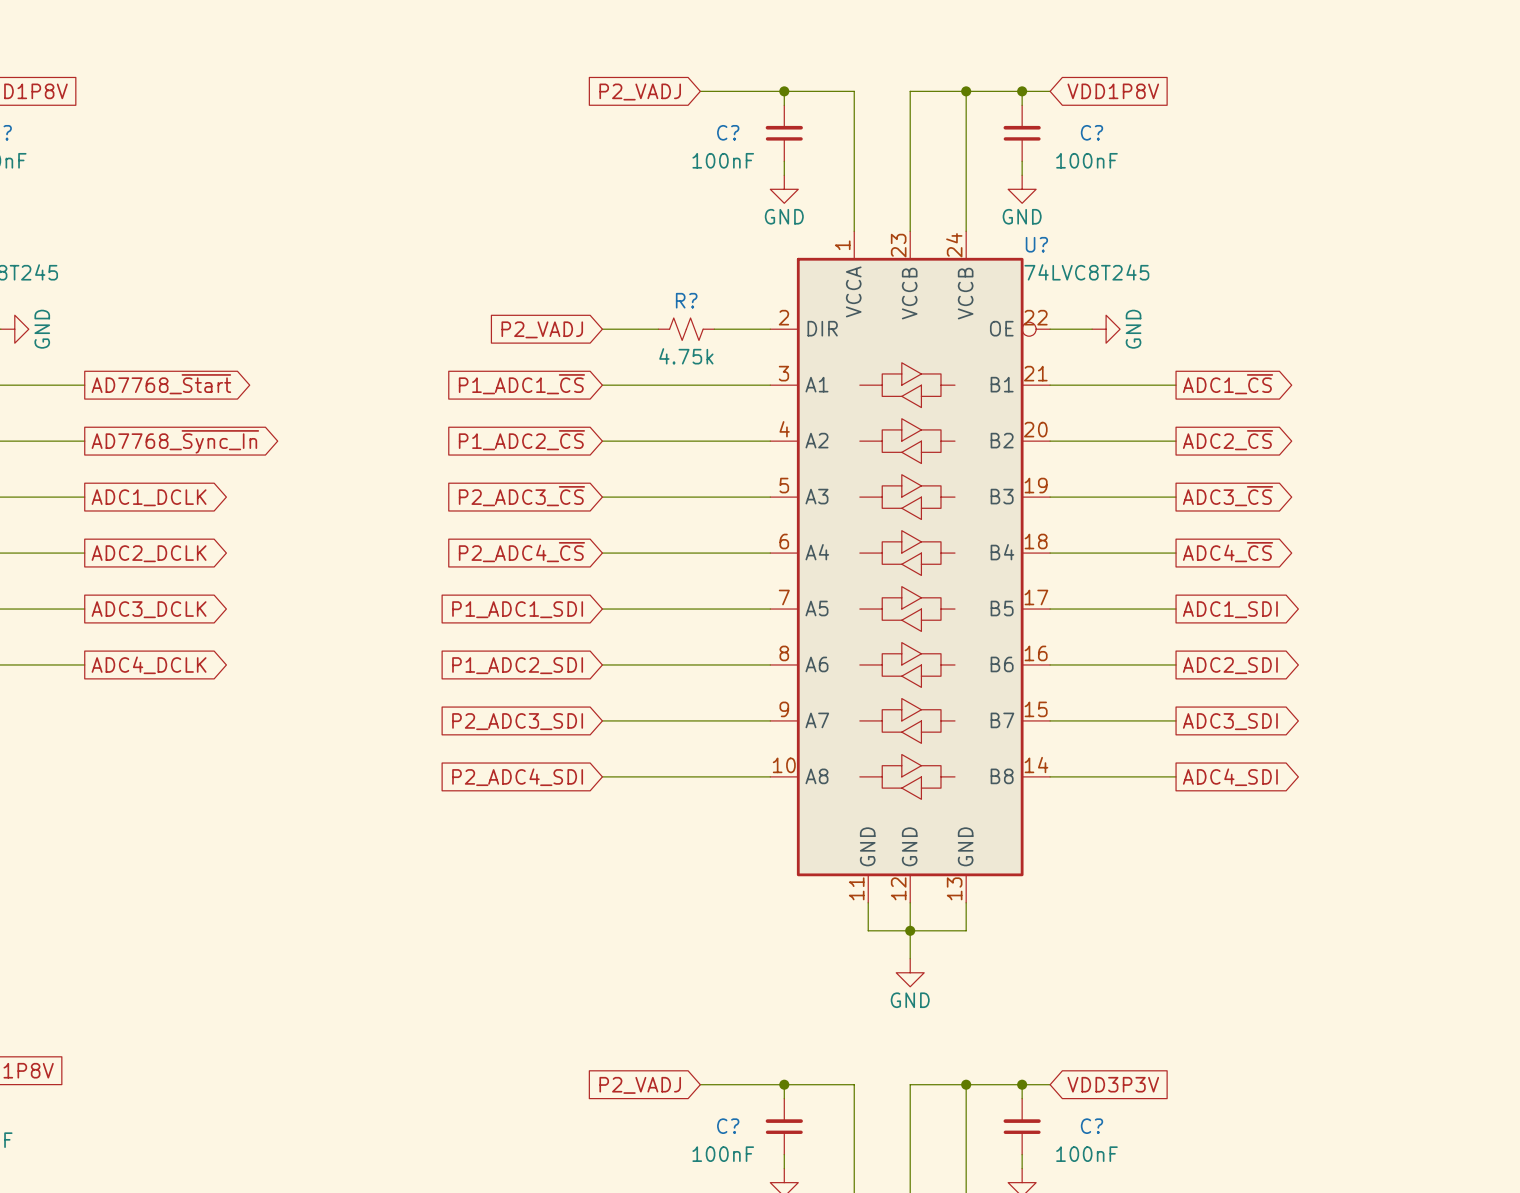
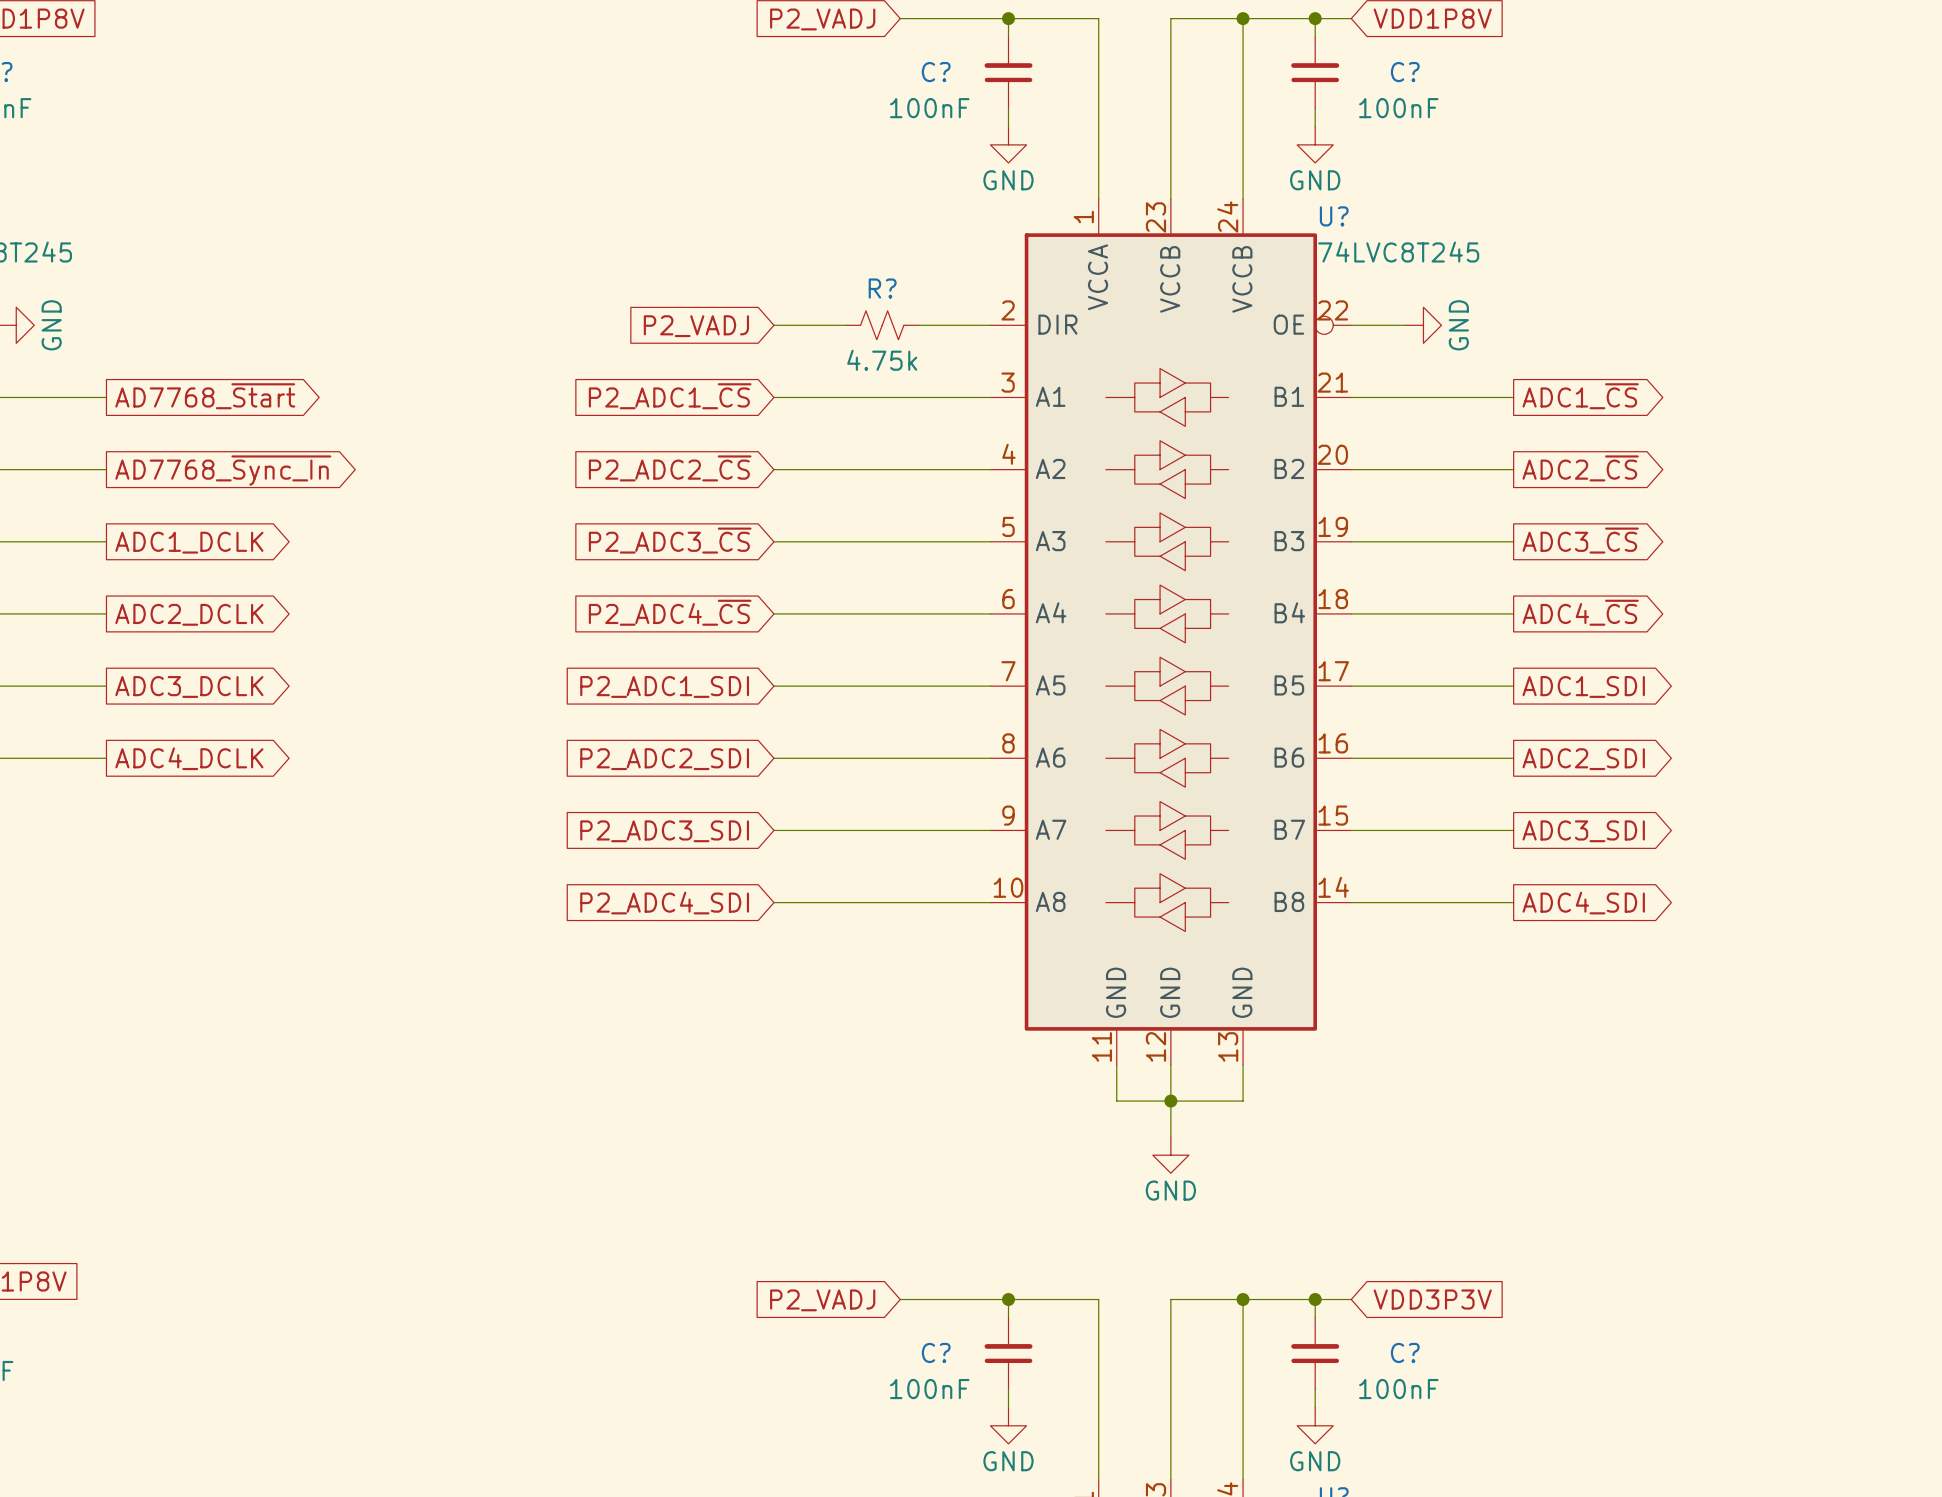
global label: P1_ADC1_~{CS} (521, 384) -> P2_ADC1_~{CS} (670, 396)
global label: P1_ADC2_~{CS} (521, 440) -> P2_ADC2_~{CS} (670, 468)
global label: P1_ADC1_SDI (517, 609) -> P2_ADC1_SDI (664, 686)
global label: P1_ADC2_SDI (517, 665) -> P2_ADC2_SDI (664, 759)

